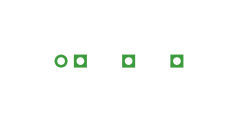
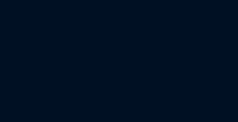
part: (70, 61) -> none
part: (128, 61) -> none
part: (176, 61) -> none

